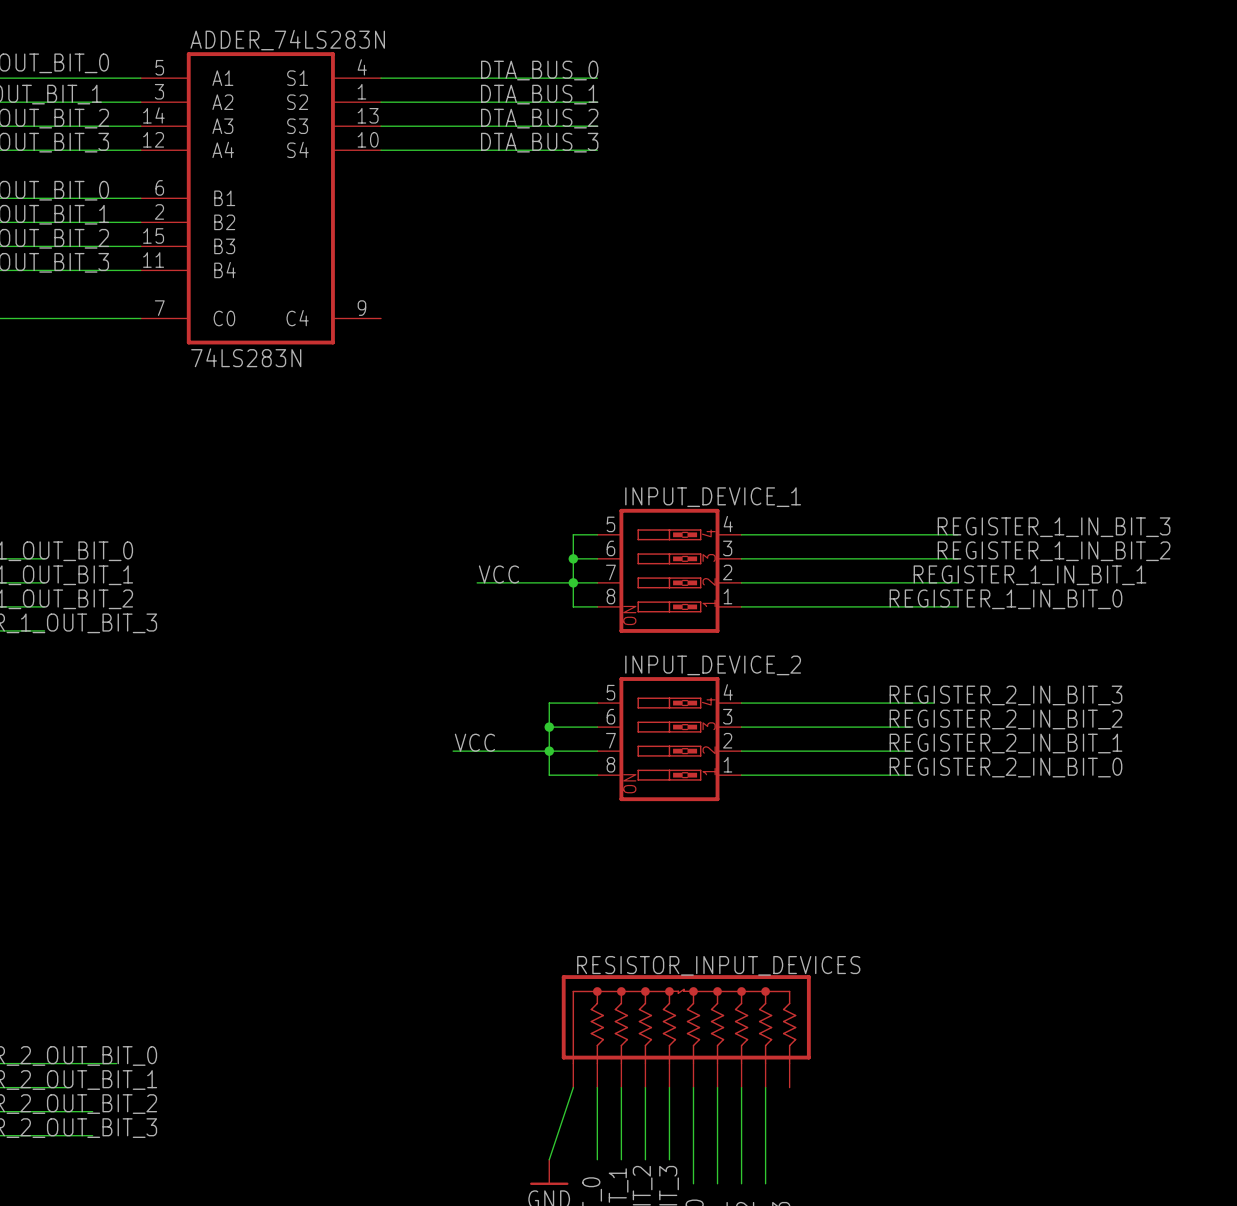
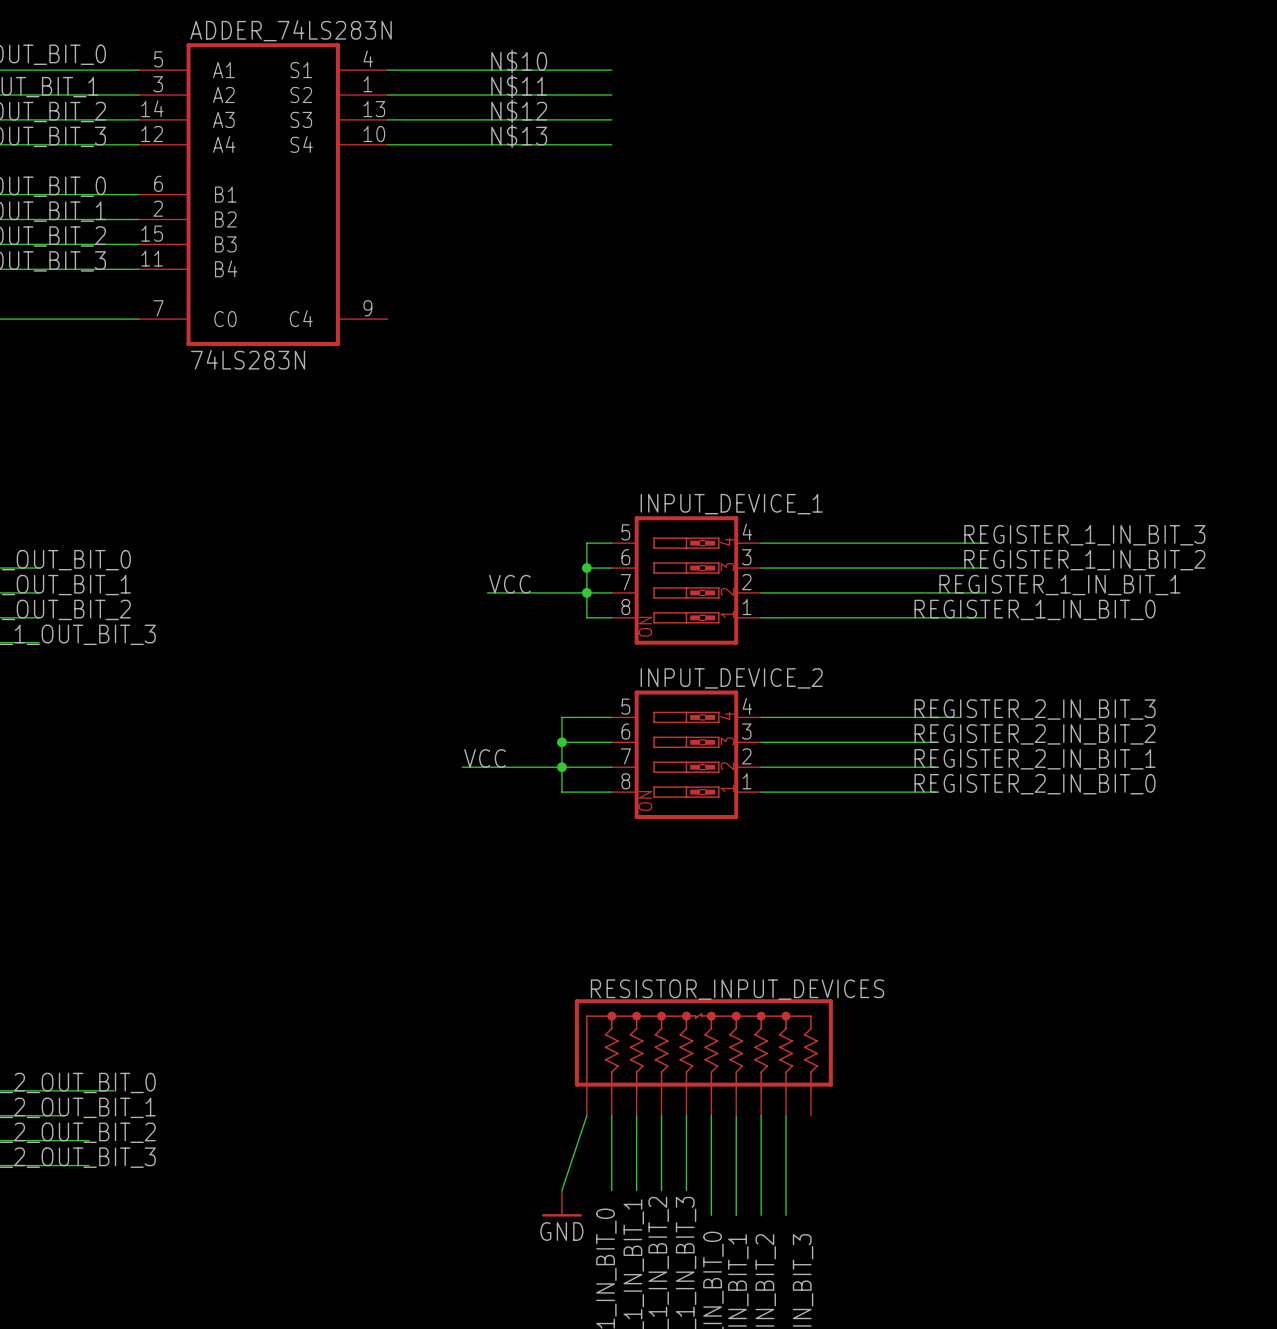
label: DTA_BUS_0 (539, 70) -> N$10 (519, 61)
label: DTA_BUS_1 (539, 94) -> N$11 (519, 86)
label: DTA_BUS_2 (539, 118) -> N$12 (519, 111)
label: DTA_BUS_3 (539, 142) -> N$13 (519, 136)

